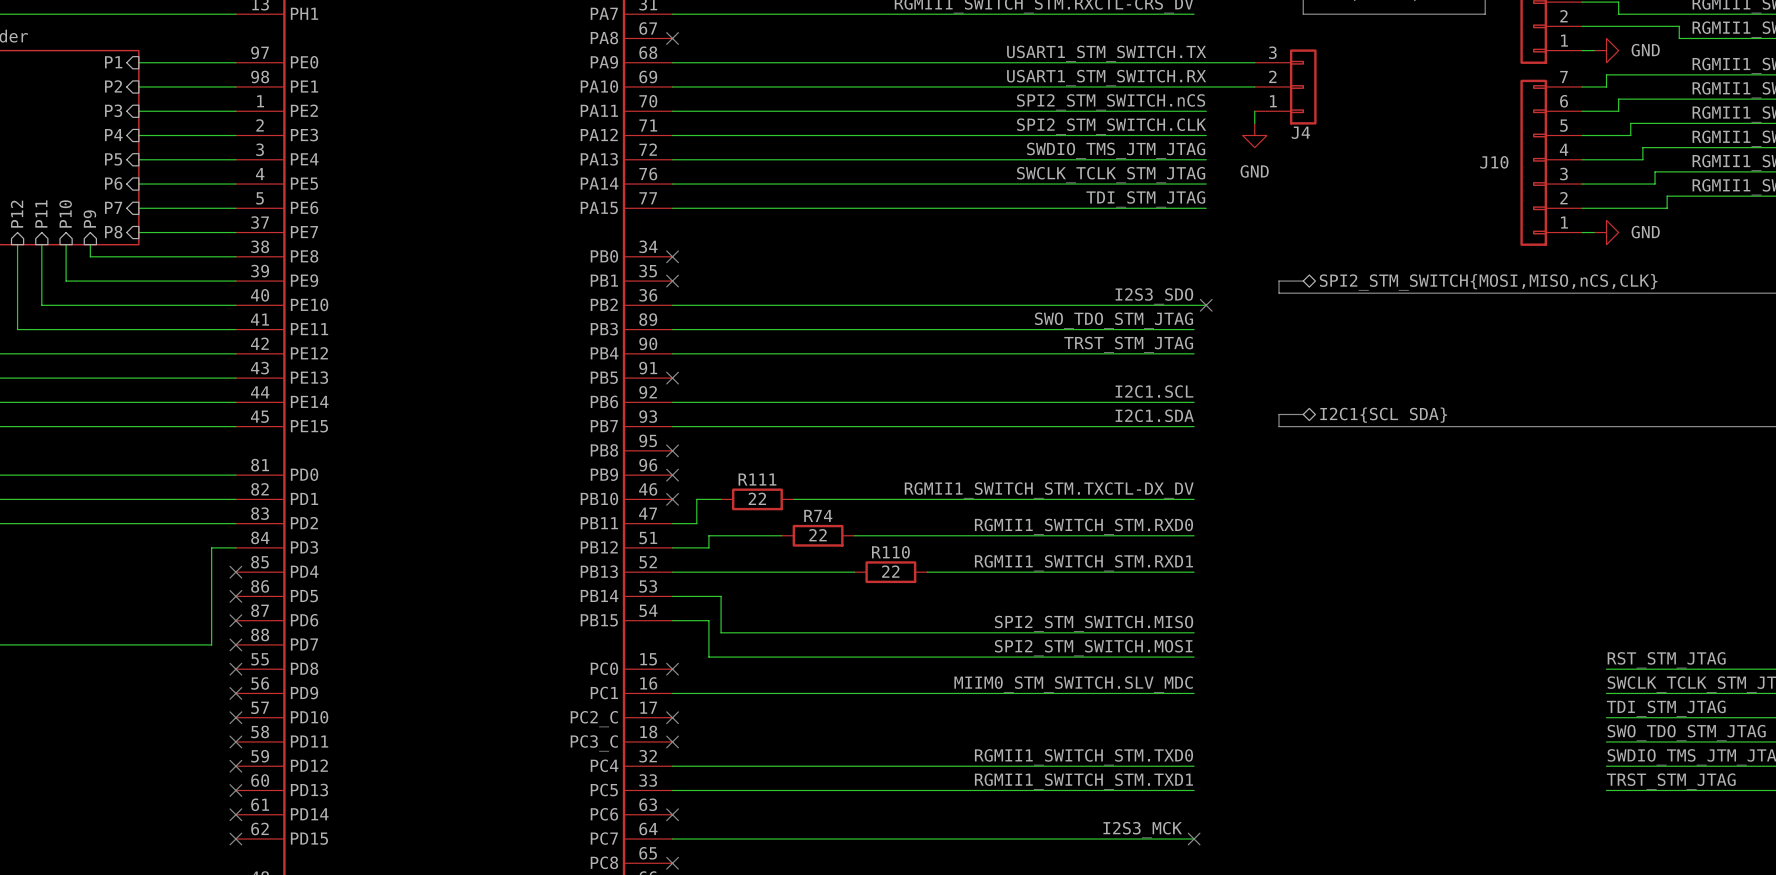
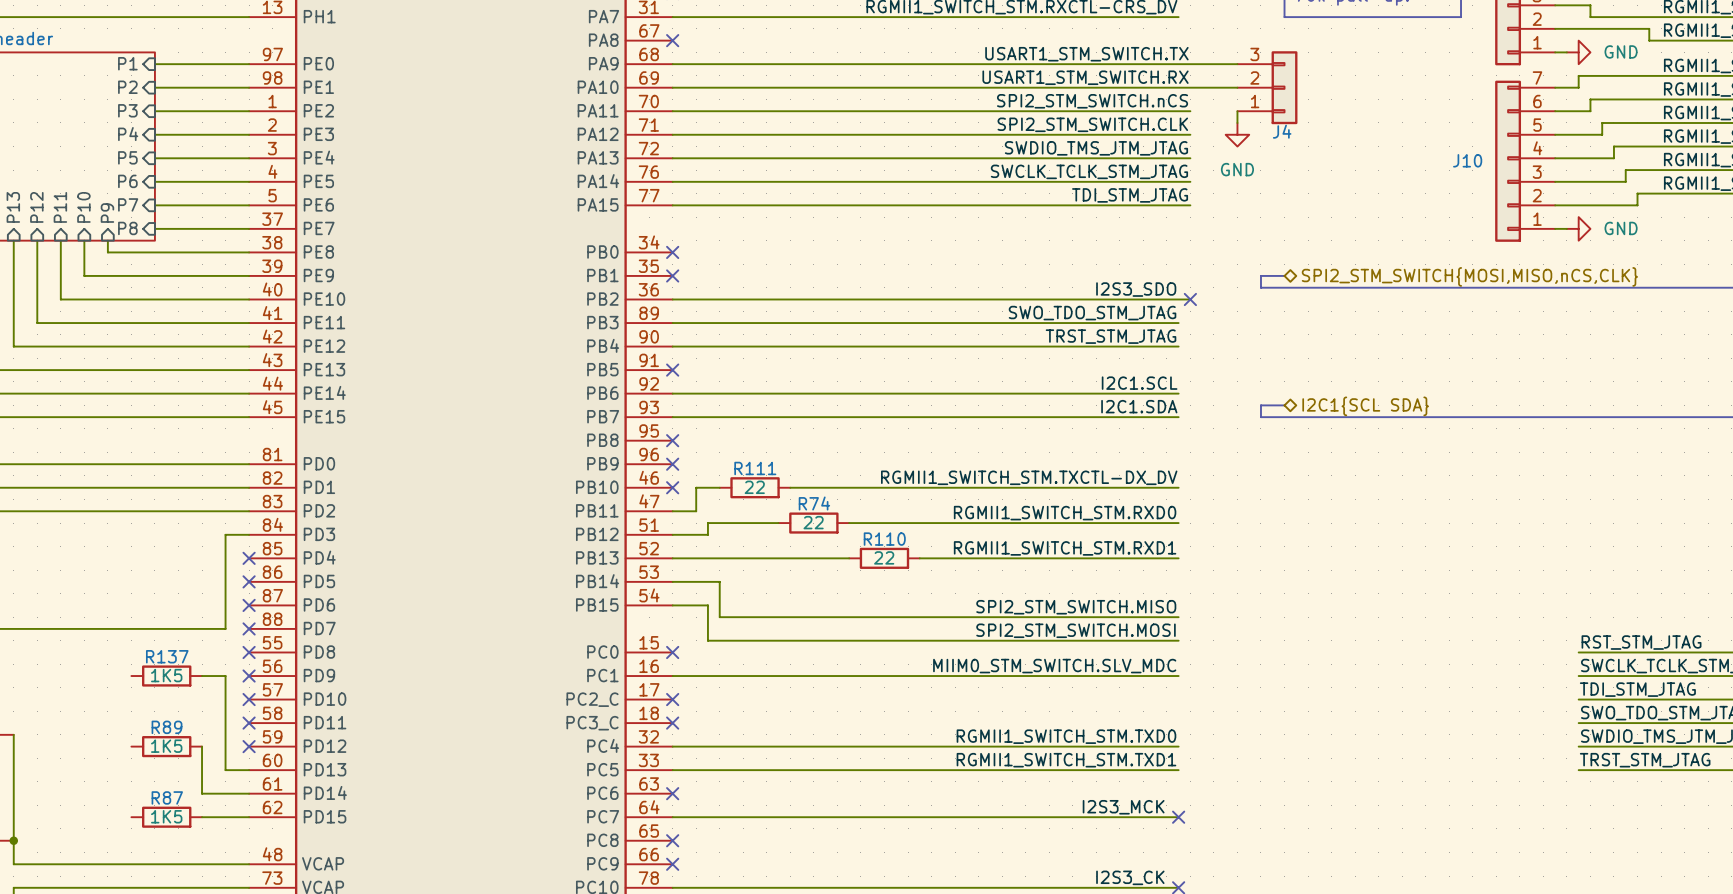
R137: none -> 1K5 (166, 676)
wire: none -> (202, 676) (225, 676) (225, 770) (249, 770)
R89: none -> 1K5 (166, 746)
wire: none -> (202, 746) (202, 793) (249, 793)
no-connect mark: (235, 790) -> none
no-connect mark: (235, 814) -> none
R87: none -> 1K5 (166, 817)
wire: none -> (202, 817) (249, 817)
no-connect mark: (235, 839) -> none

